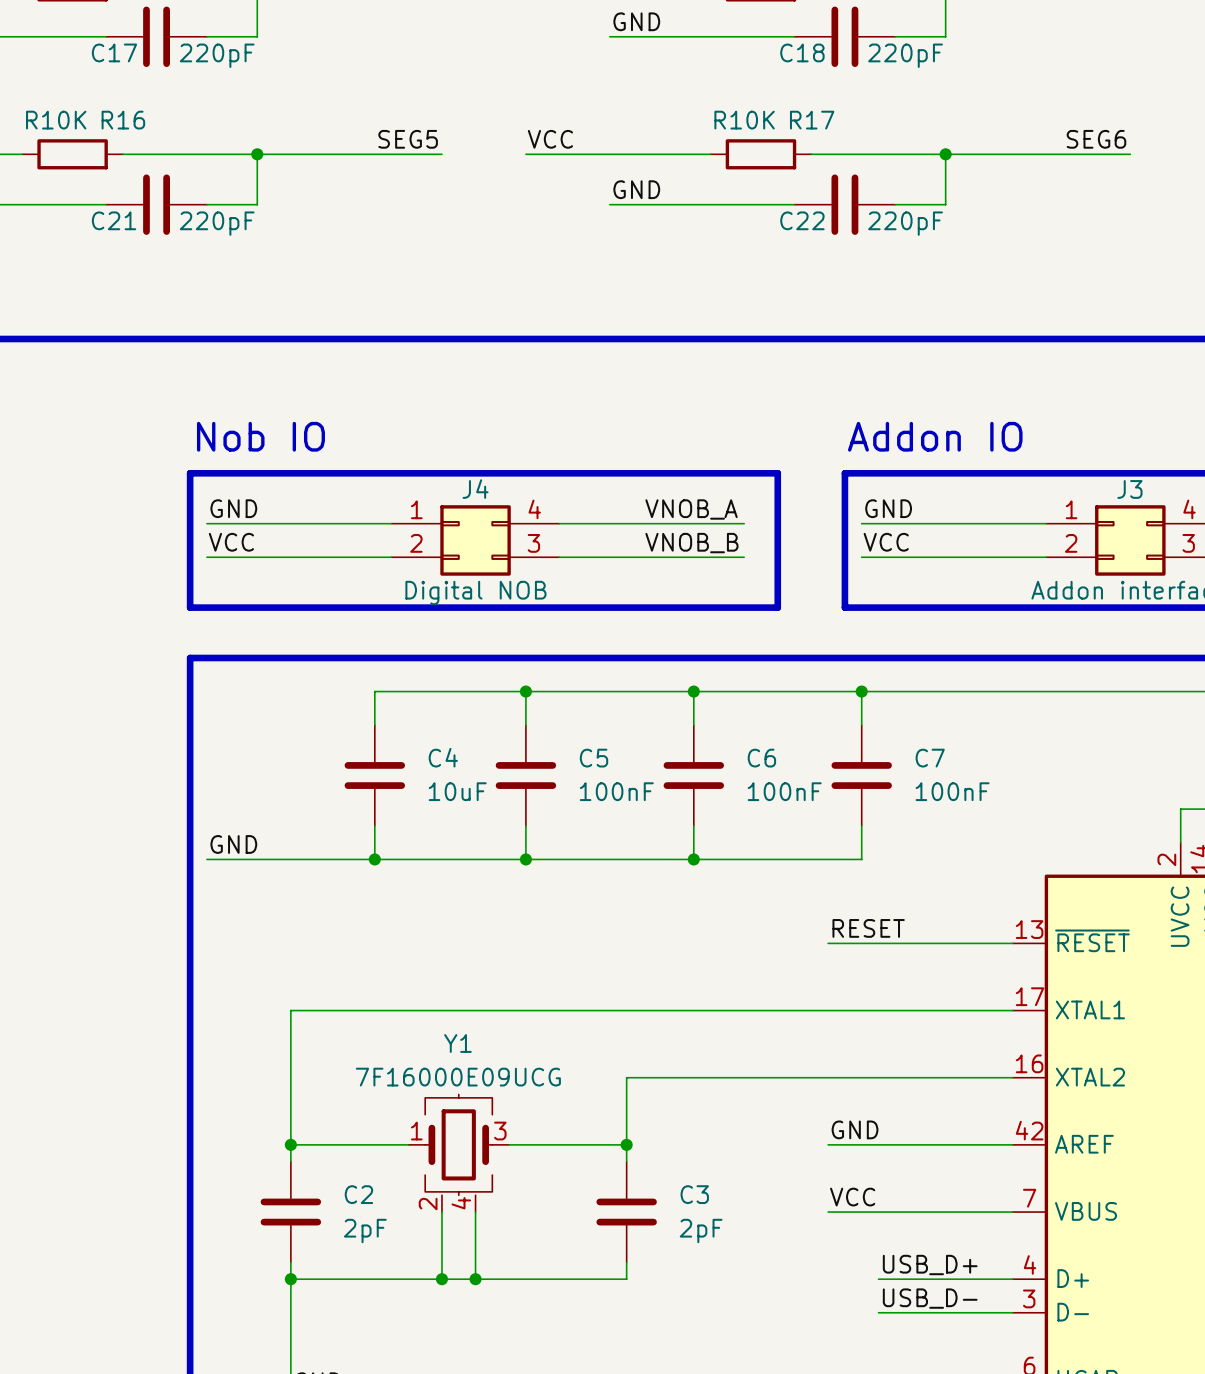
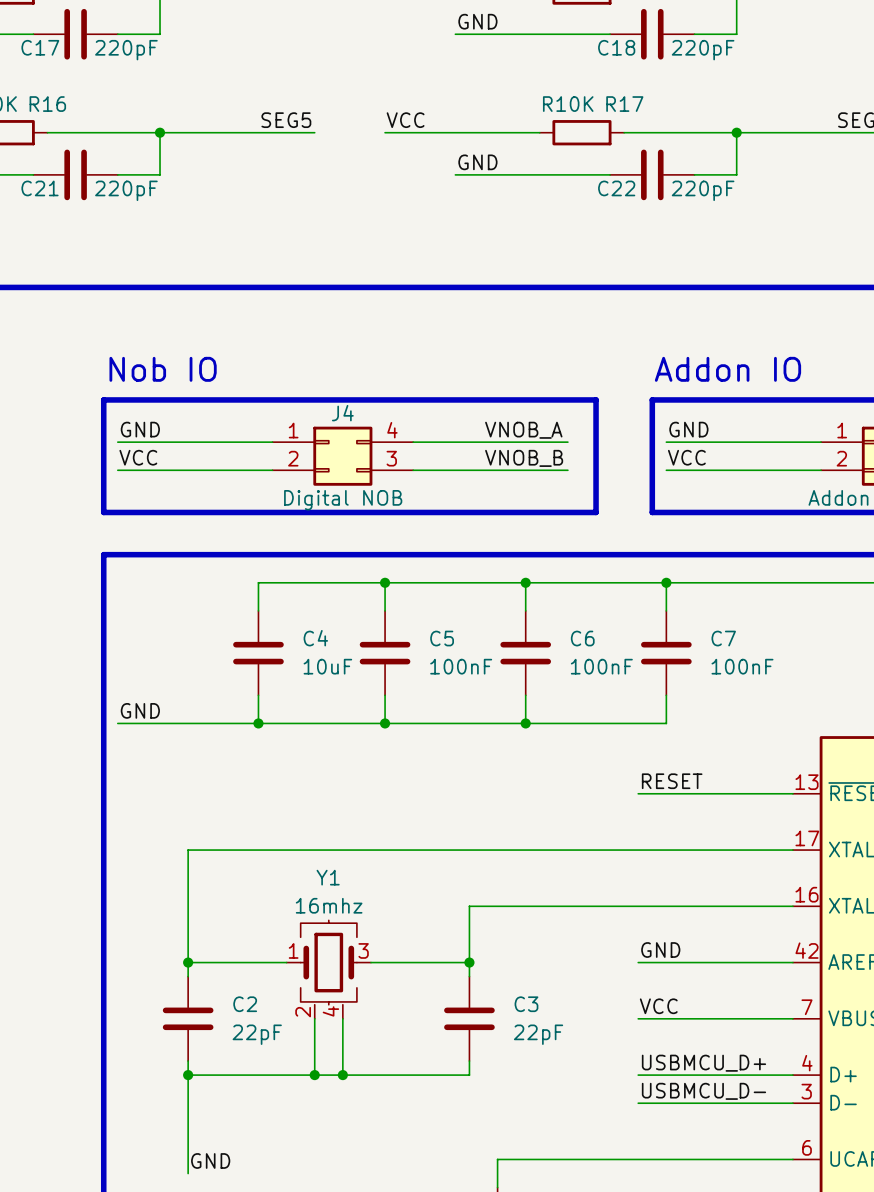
Y1 value: 7F16000E09UCG (458, 1077) -> 16mhz (329, 905)
C2 value: 2pF (365, 1230) -> 22pF (257, 1034)
C3 value: 2pF (701, 1230) -> 22pF (538, 1034)
label: none -> USBMCU_D+ (703, 1063)
label: USB_D+ (930, 1265) -> none
wire: none -> (638, 1075) (680, 1075)
label: none -> USBMCU_D- (703, 1091)
label: USB_D- (930, 1298) -> none
wire: none -> (638, 1103) (680, 1103)

